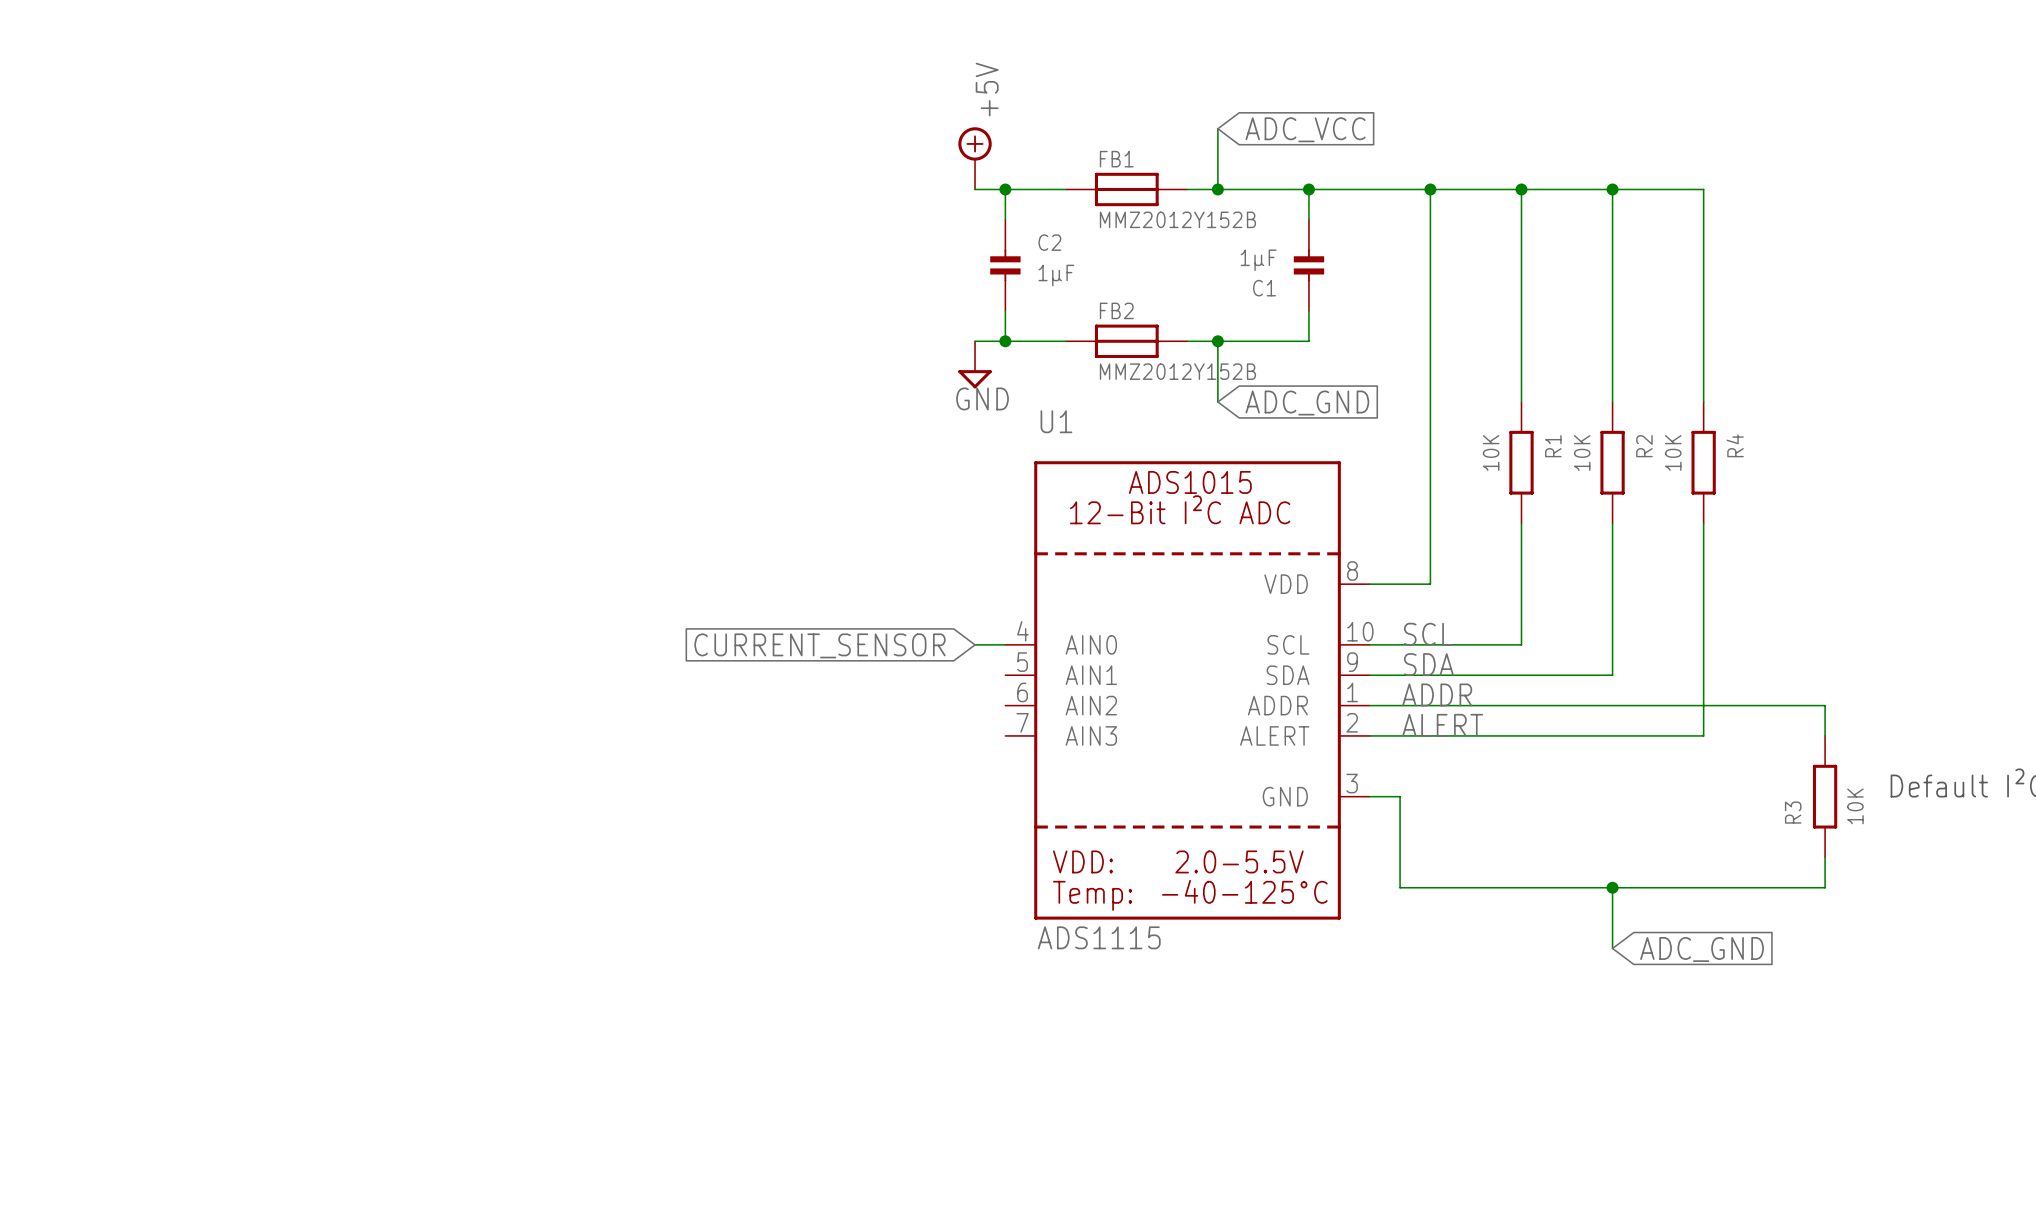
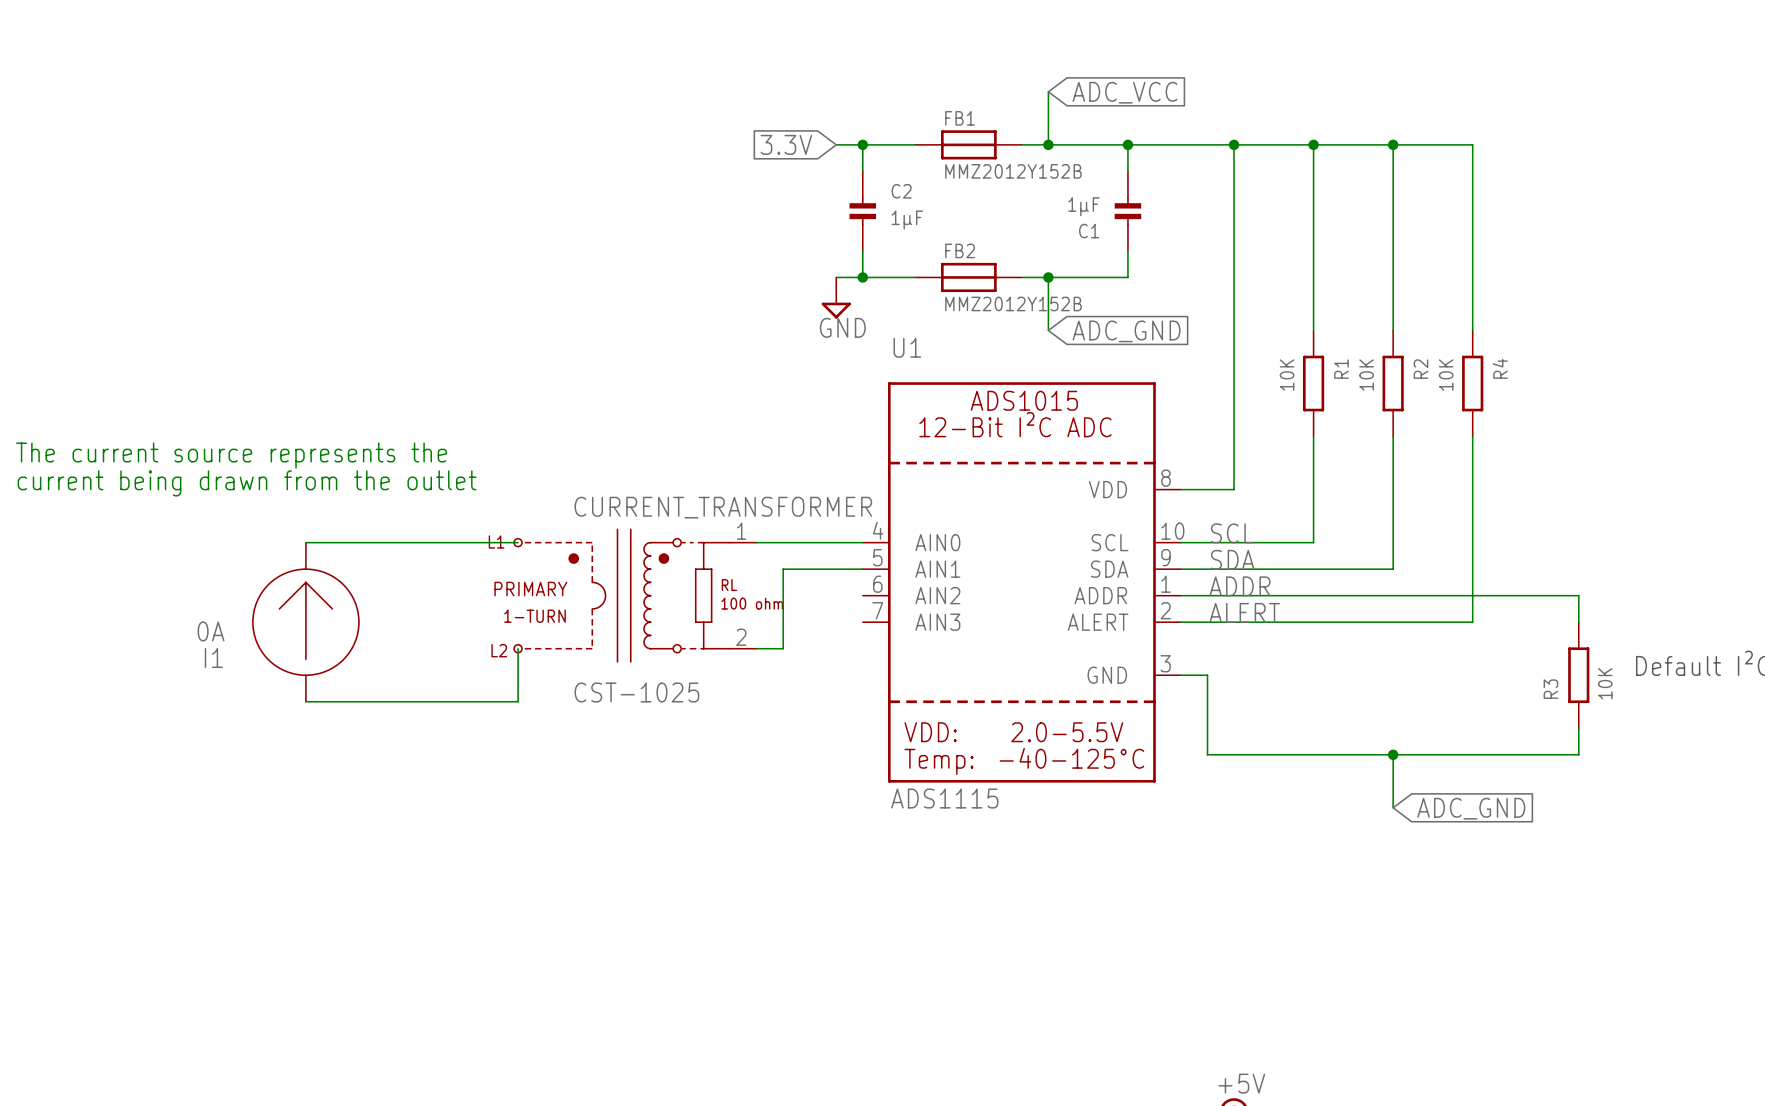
power symbol: +5V (975, 158) -> none
global label: none -> 3.3V (786, 144)
text: none -> The current source represents the (231, 455)
text: none -> current being drawn from the outlet (247, 483)
wire: none -> (305, 542) (518, 542)
wire: none -> (756, 542) (836, 542)
global label: CURRENT_SENSOR (819, 645) -> none
wire: none -> (862, 569) (783, 569) (783, 648) (756, 648)
CURRENT_TRANSFORMER: none -> CST-1025 (635, 595)
I1: none -> 0A (305, 622)
wire: none -> (518, 648) (518, 701) (305, 701)

